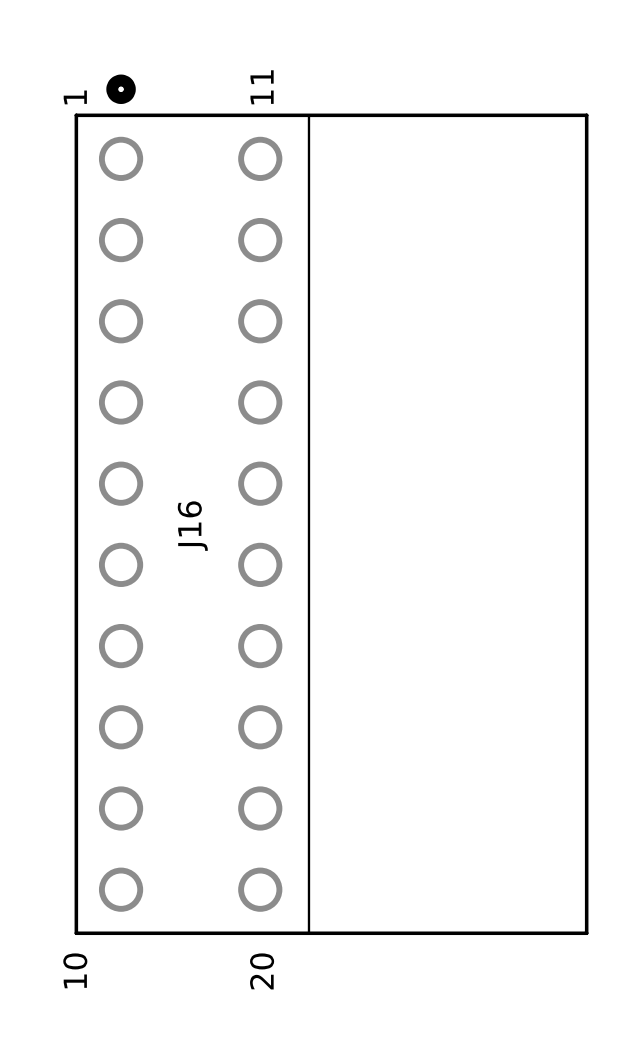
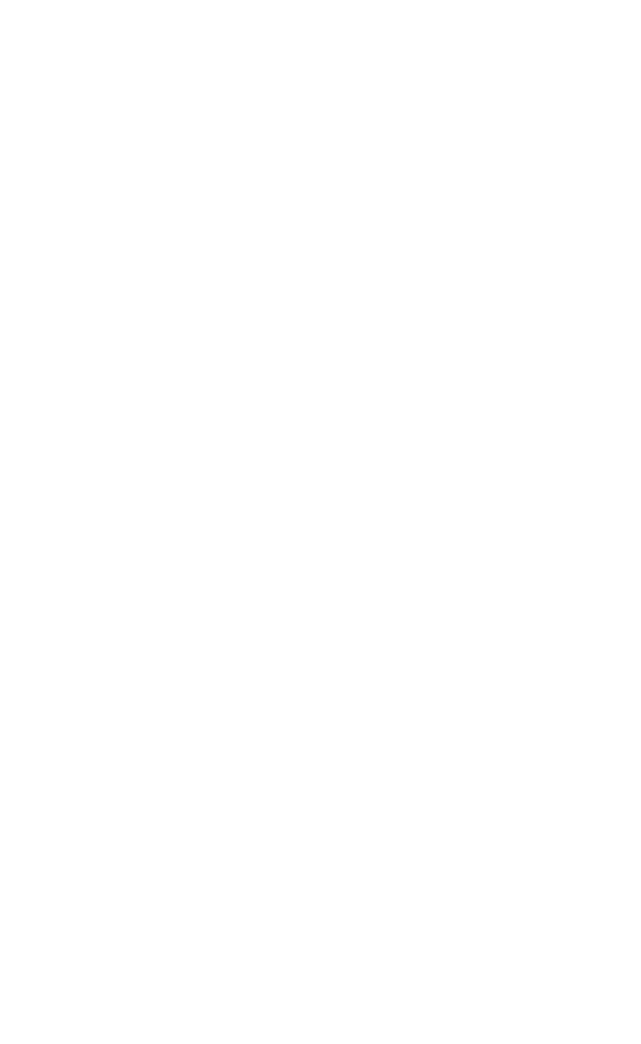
J16: (331, 504) -> none

